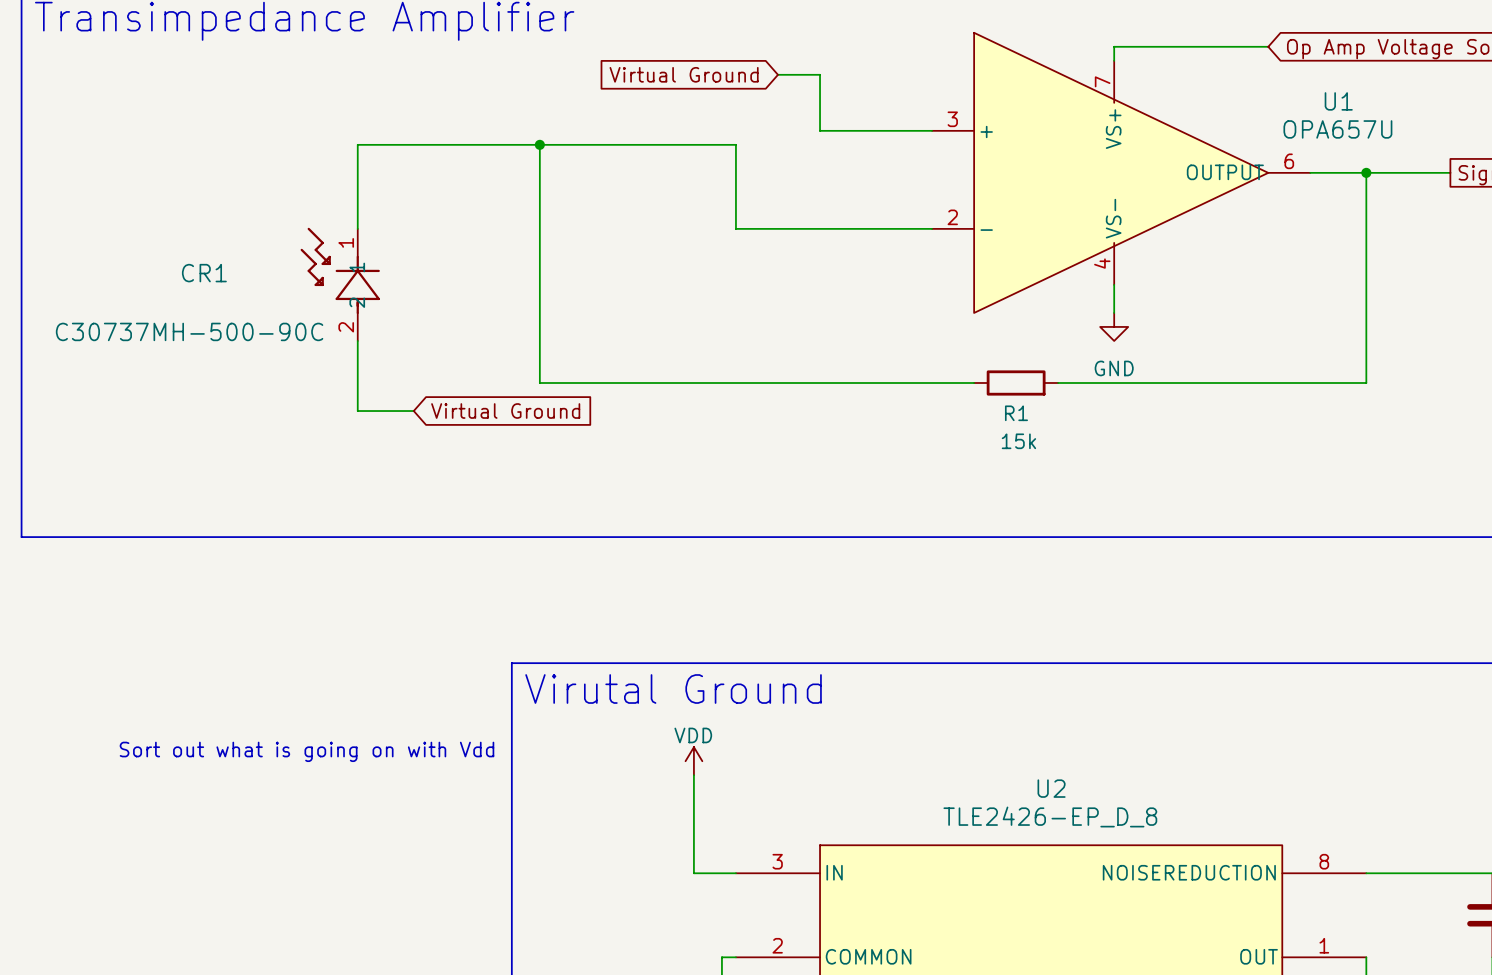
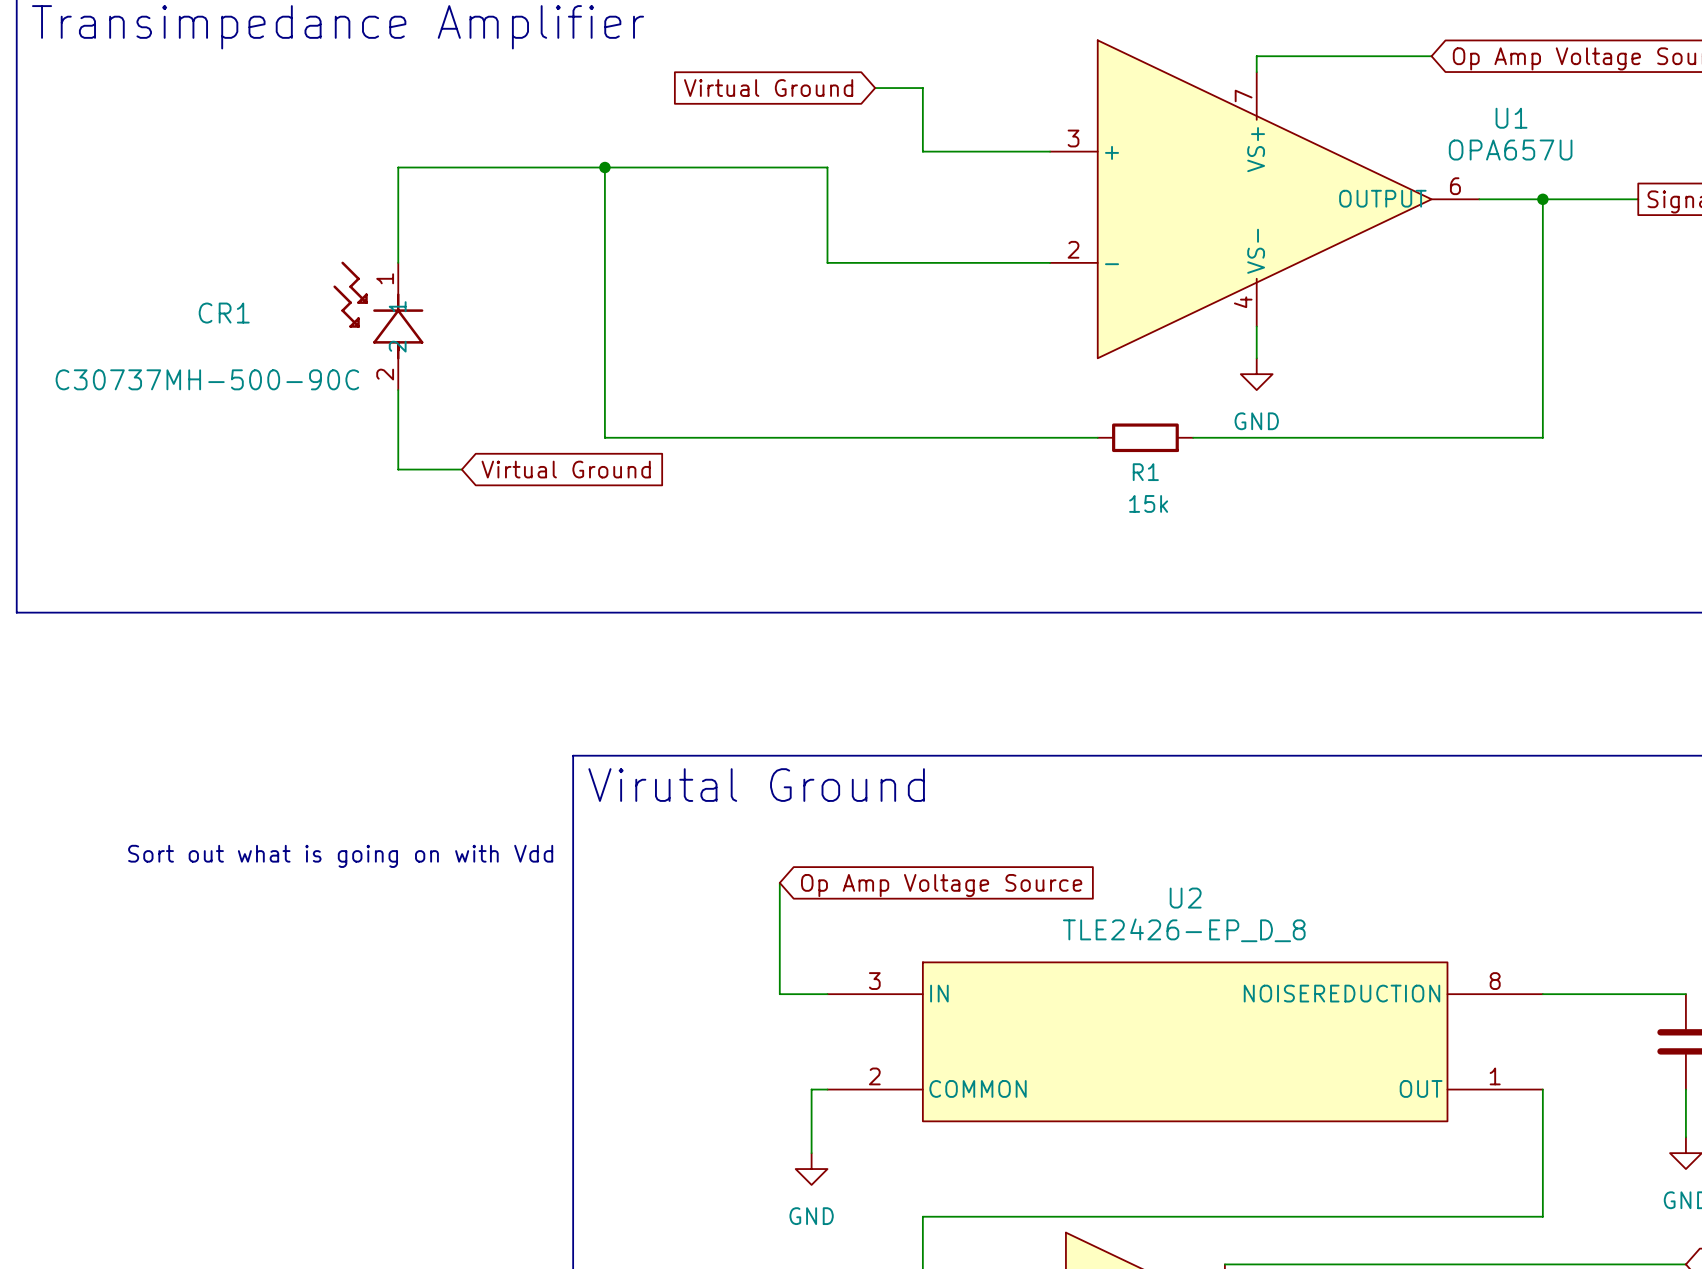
power symbol: VDD (693, 761) -> none
global label: none -> Op Amp Voltage Source (941, 885)

